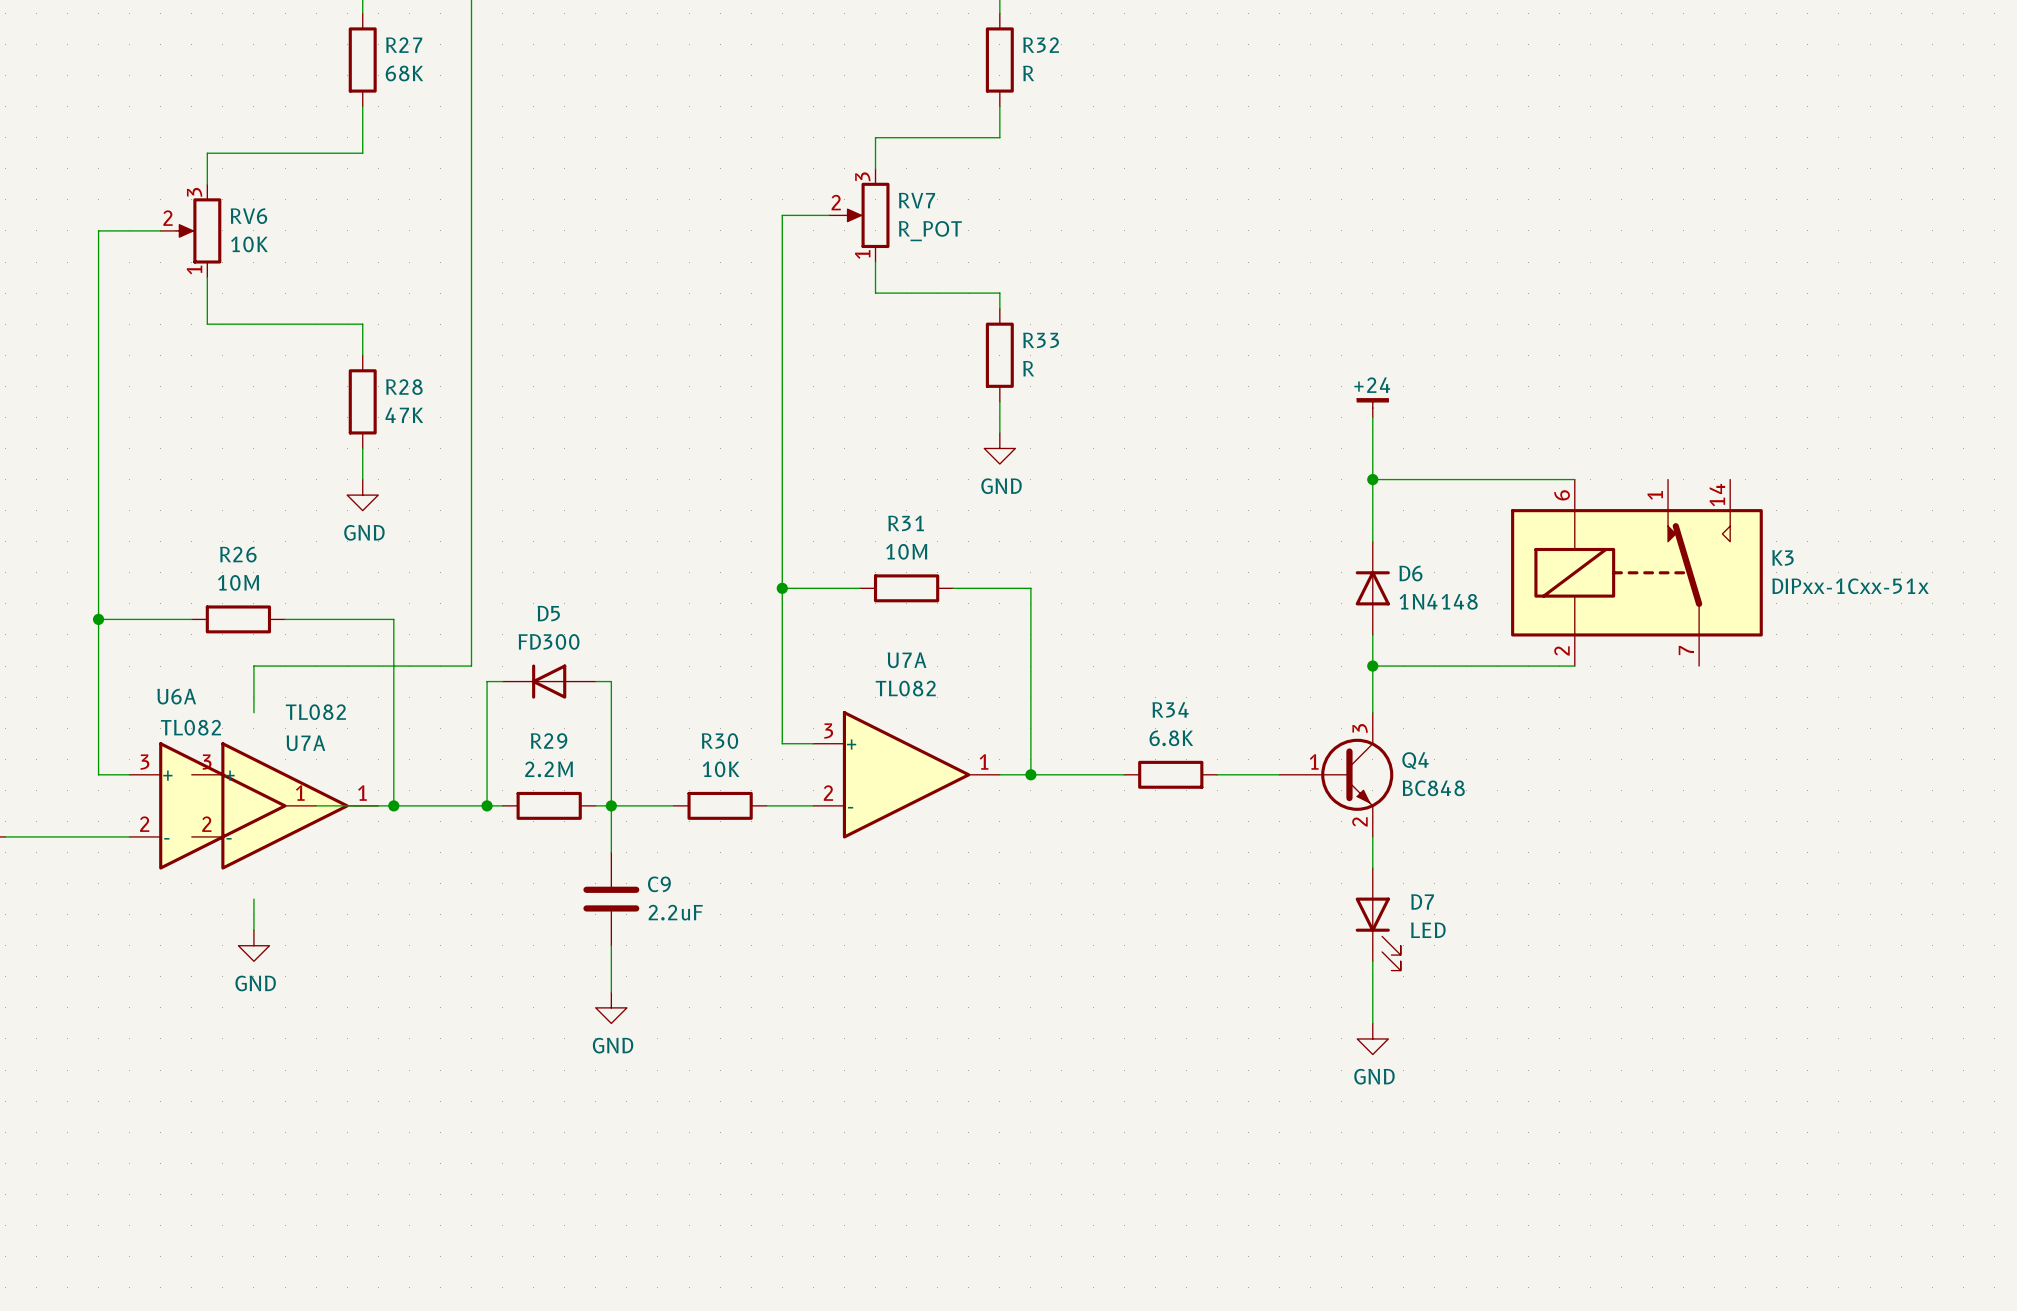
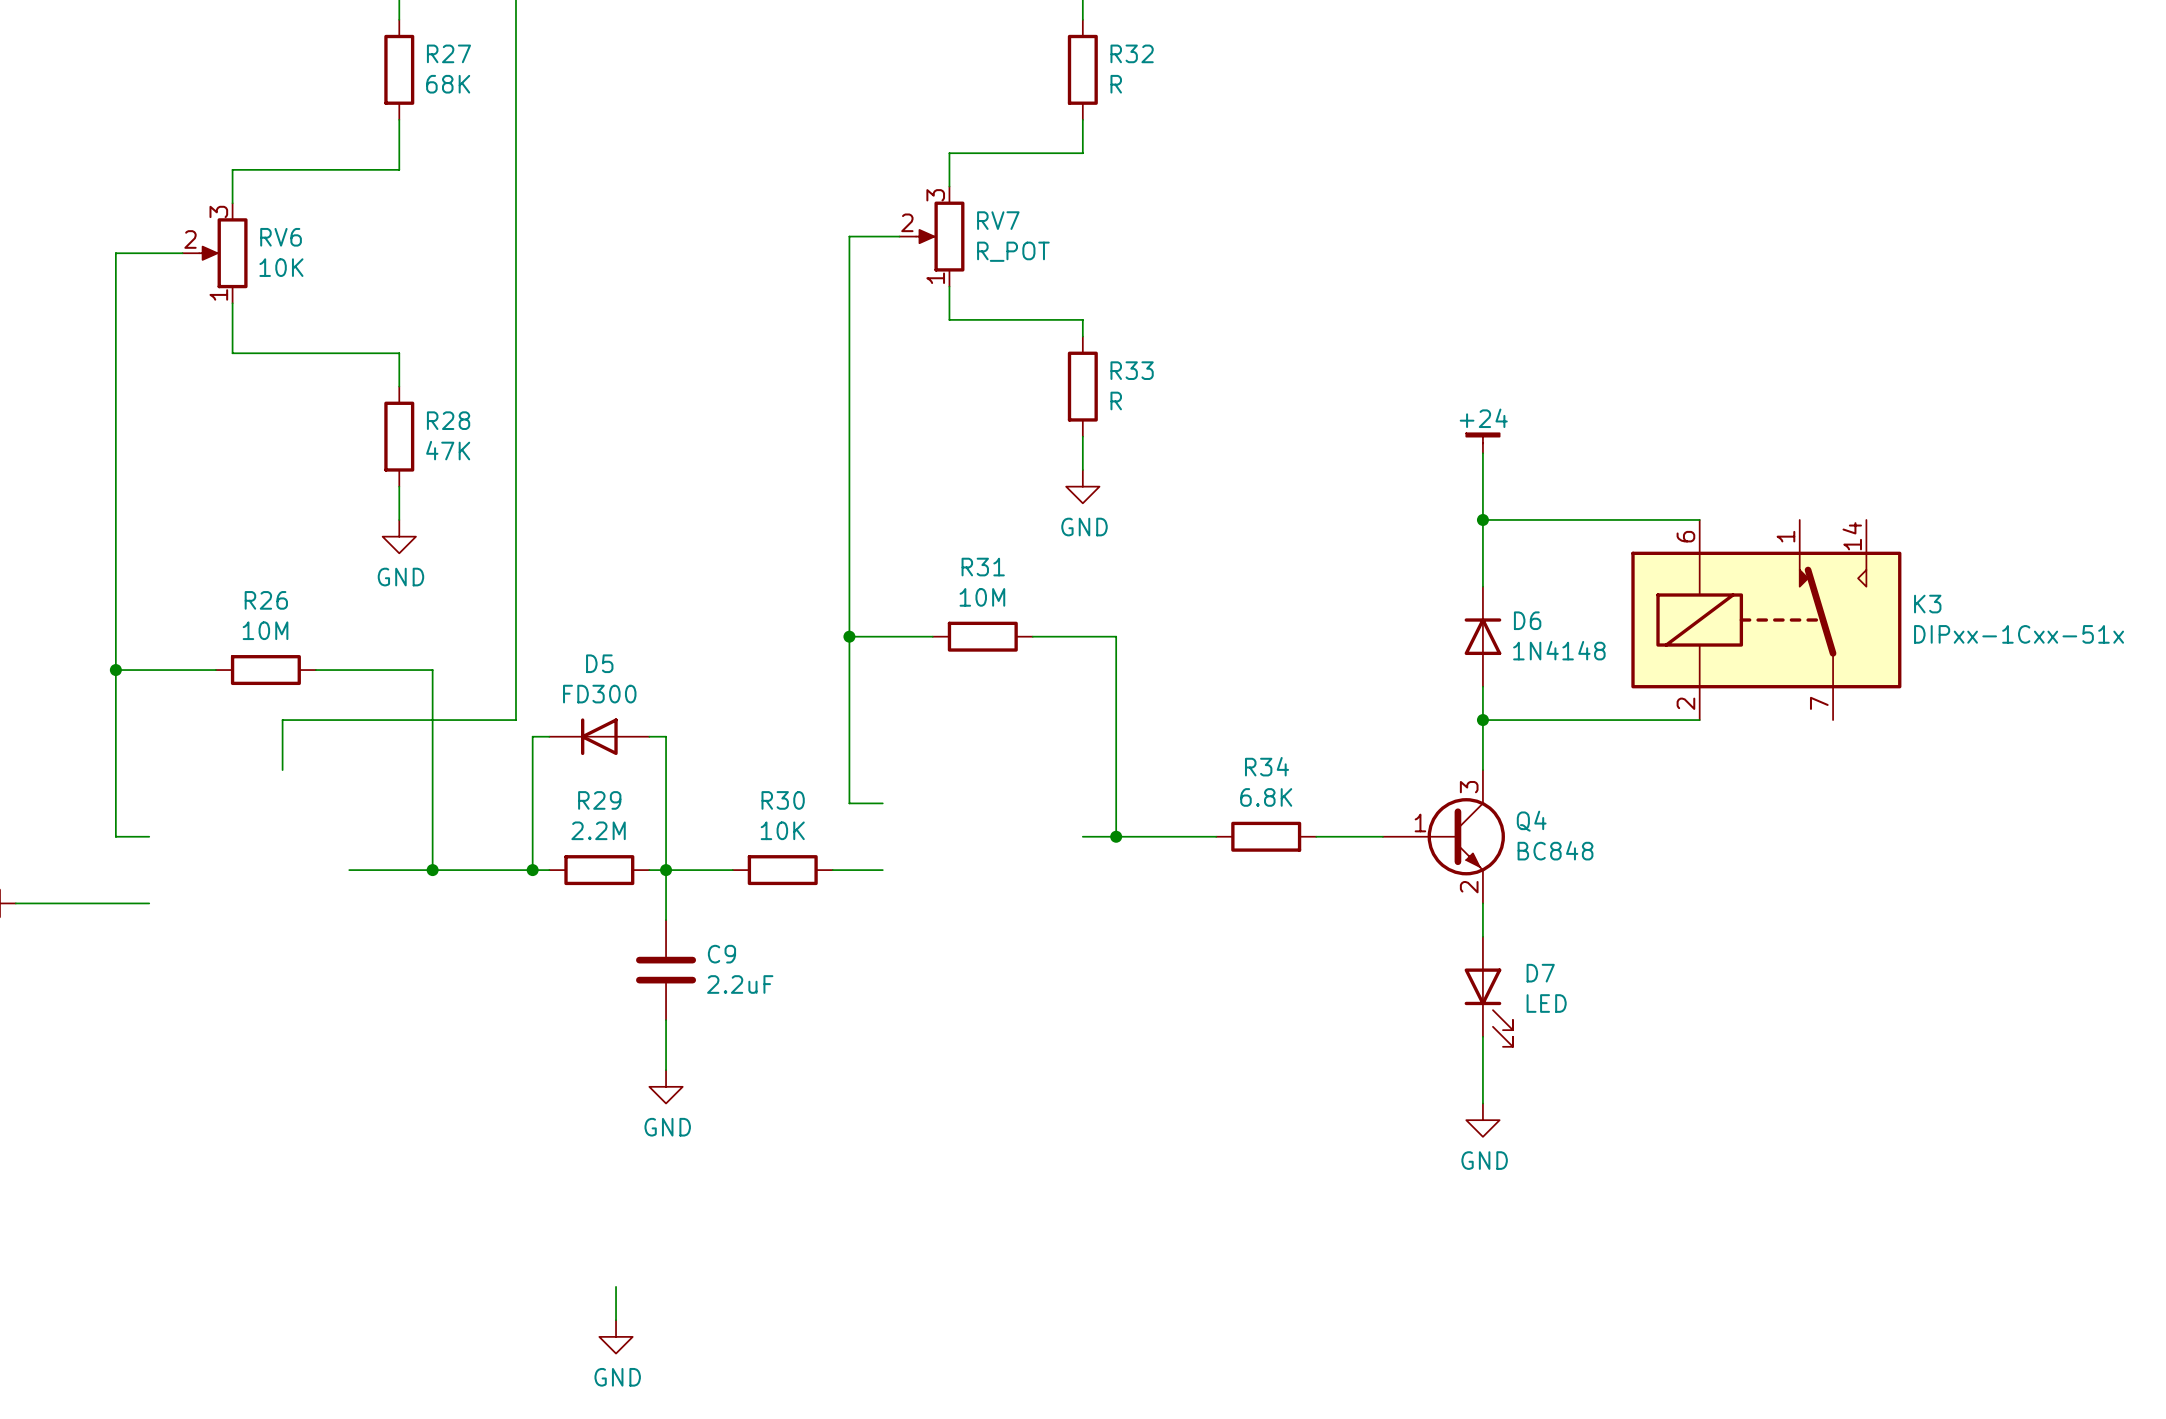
U7A: TL082 (906, 774) -> none
U6A: TL082 (222, 805) -> none
U7A: TL082 (285, 805) -> none
wire: (253, 899) (253, 930) -> none
power symbol: GND (253, 945) -> none
wire: none -> (616, 1286) (616, 1320)
power symbol: none -> GND (616, 1336)

